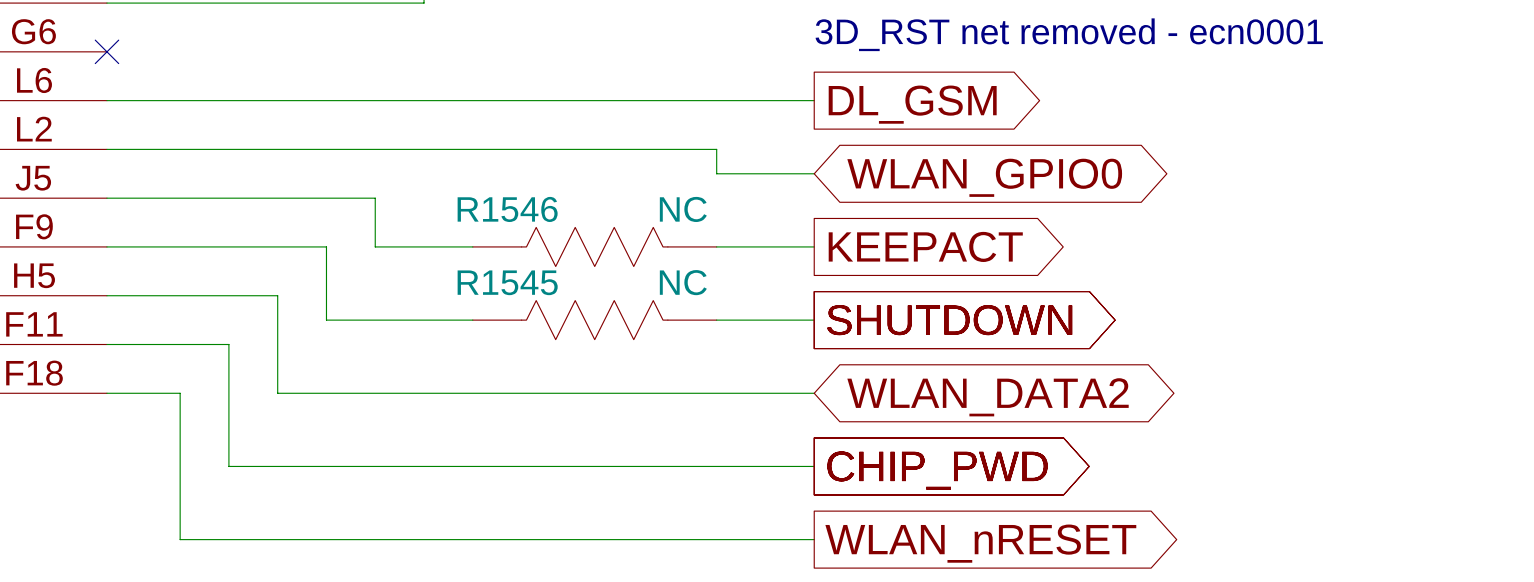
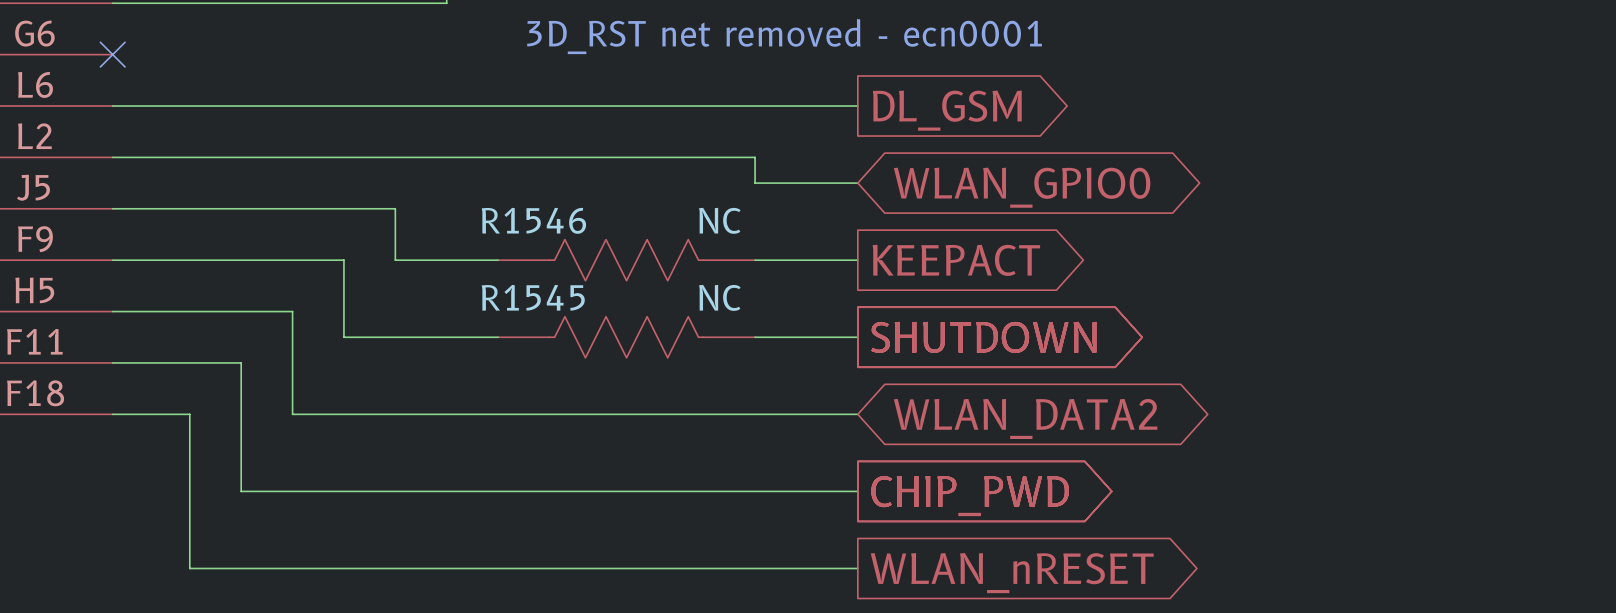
text position: 3D_RST net removed - ecn0001 (1069, 34) -> 3D_RST net removed - ecn0001 (784, 36)

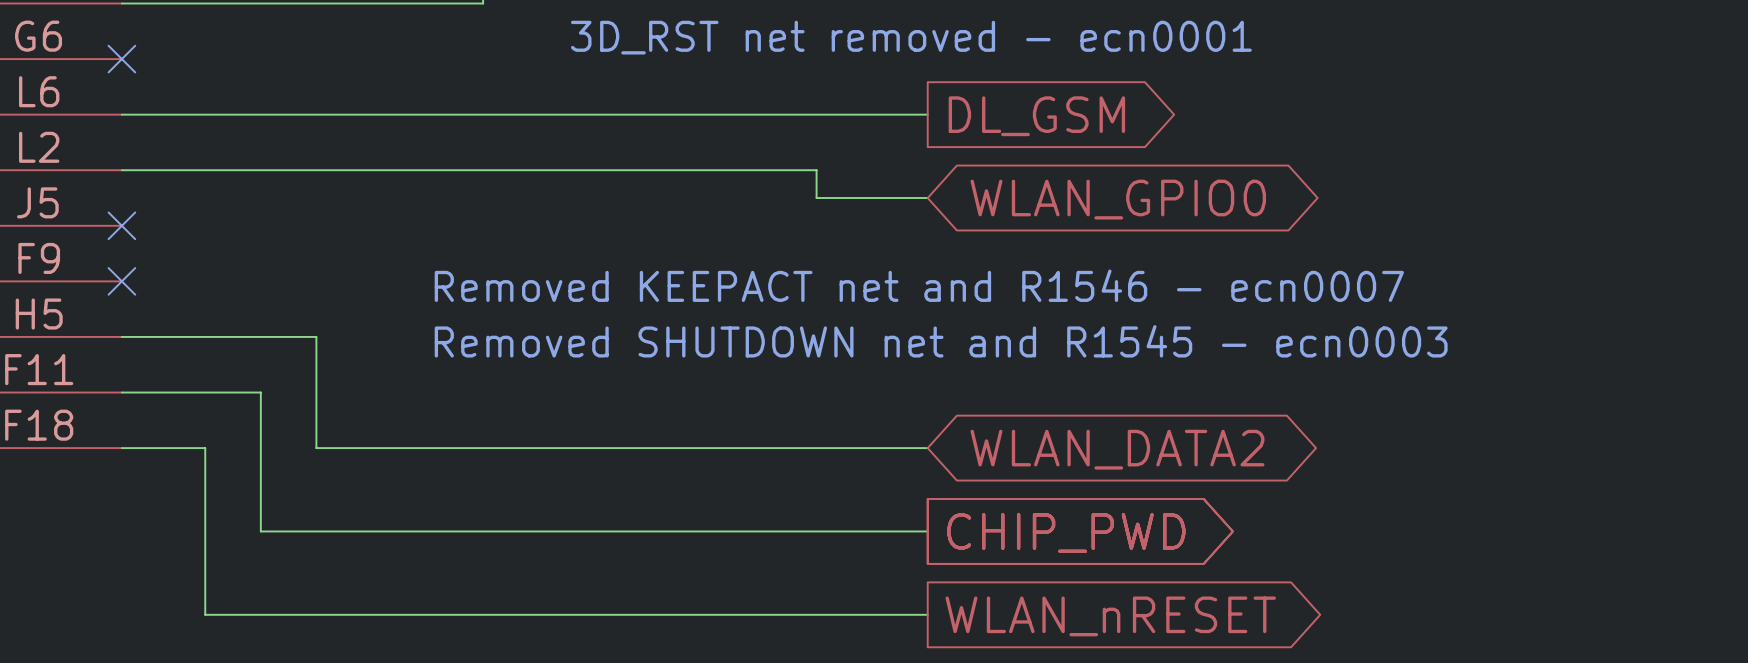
wire: (112, 208) (395, 208) (395, 260) (498, 260) -> none
no-connect mark: none -> (121, 225)
wire: (112, 260) (343, 260) (343, 337) (498, 337) -> none
no-connect mark: none -> (121, 281)
R1546: NC (626, 260) -> none
wire: (755, 260) (857, 260) -> none
global label: KEEPACT (956, 260) -> none
text: none -> Removed KEEPACT net and R1546 - ecn0007 (919, 285)
text: none -> Removed SHUTDOWN net and R1545 - ecn0003 (941, 341)
R1545: NC (626, 337) -> none
wire: (755, 337) (857, 337) -> none
global label: SHUTDOWN (983, 337) -> none

